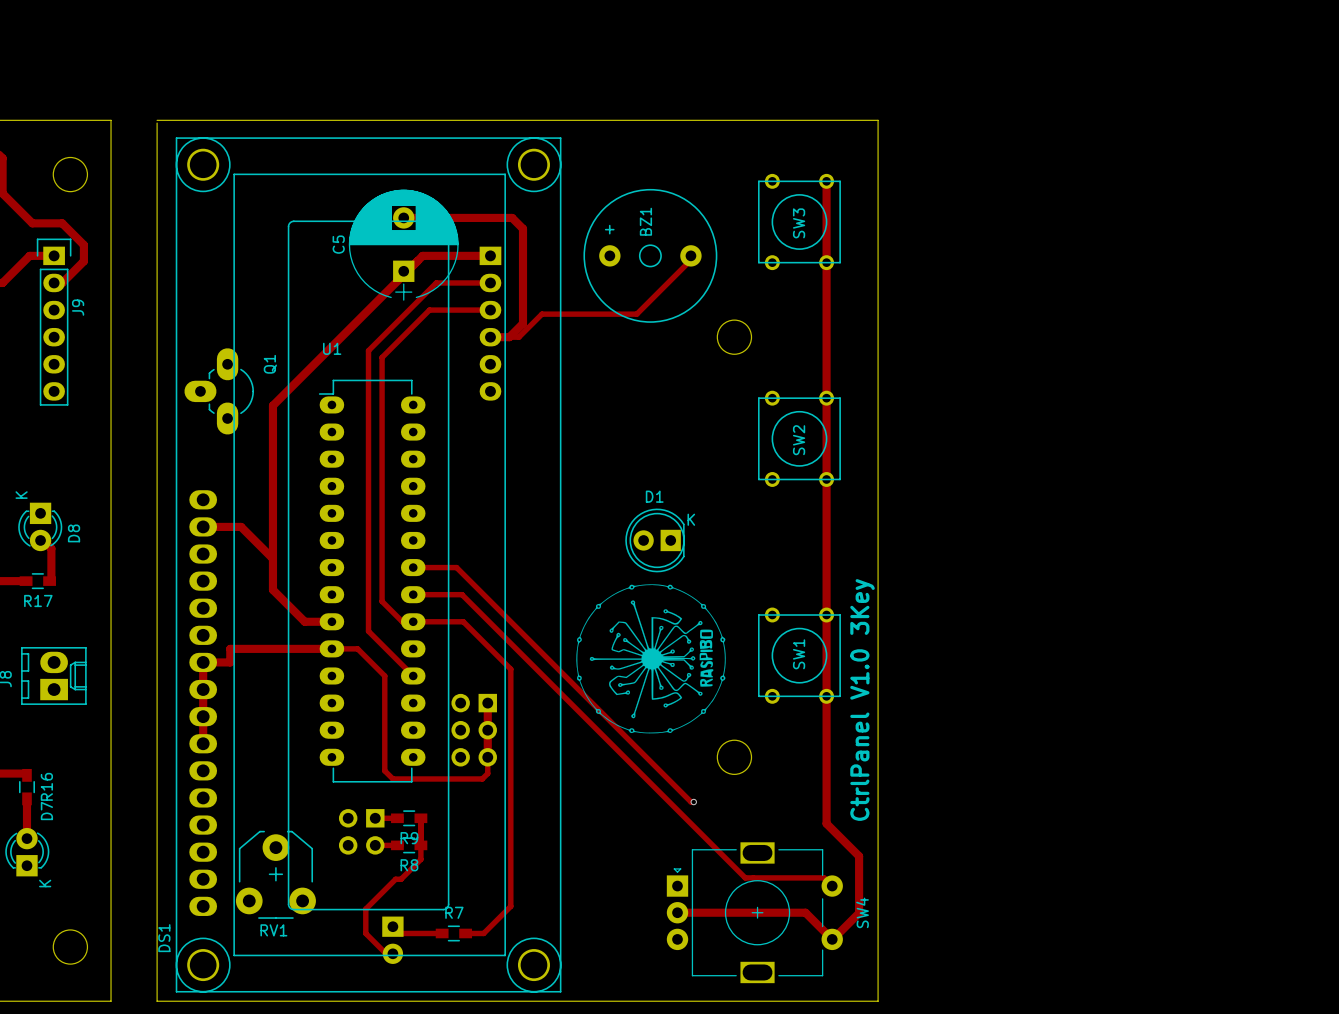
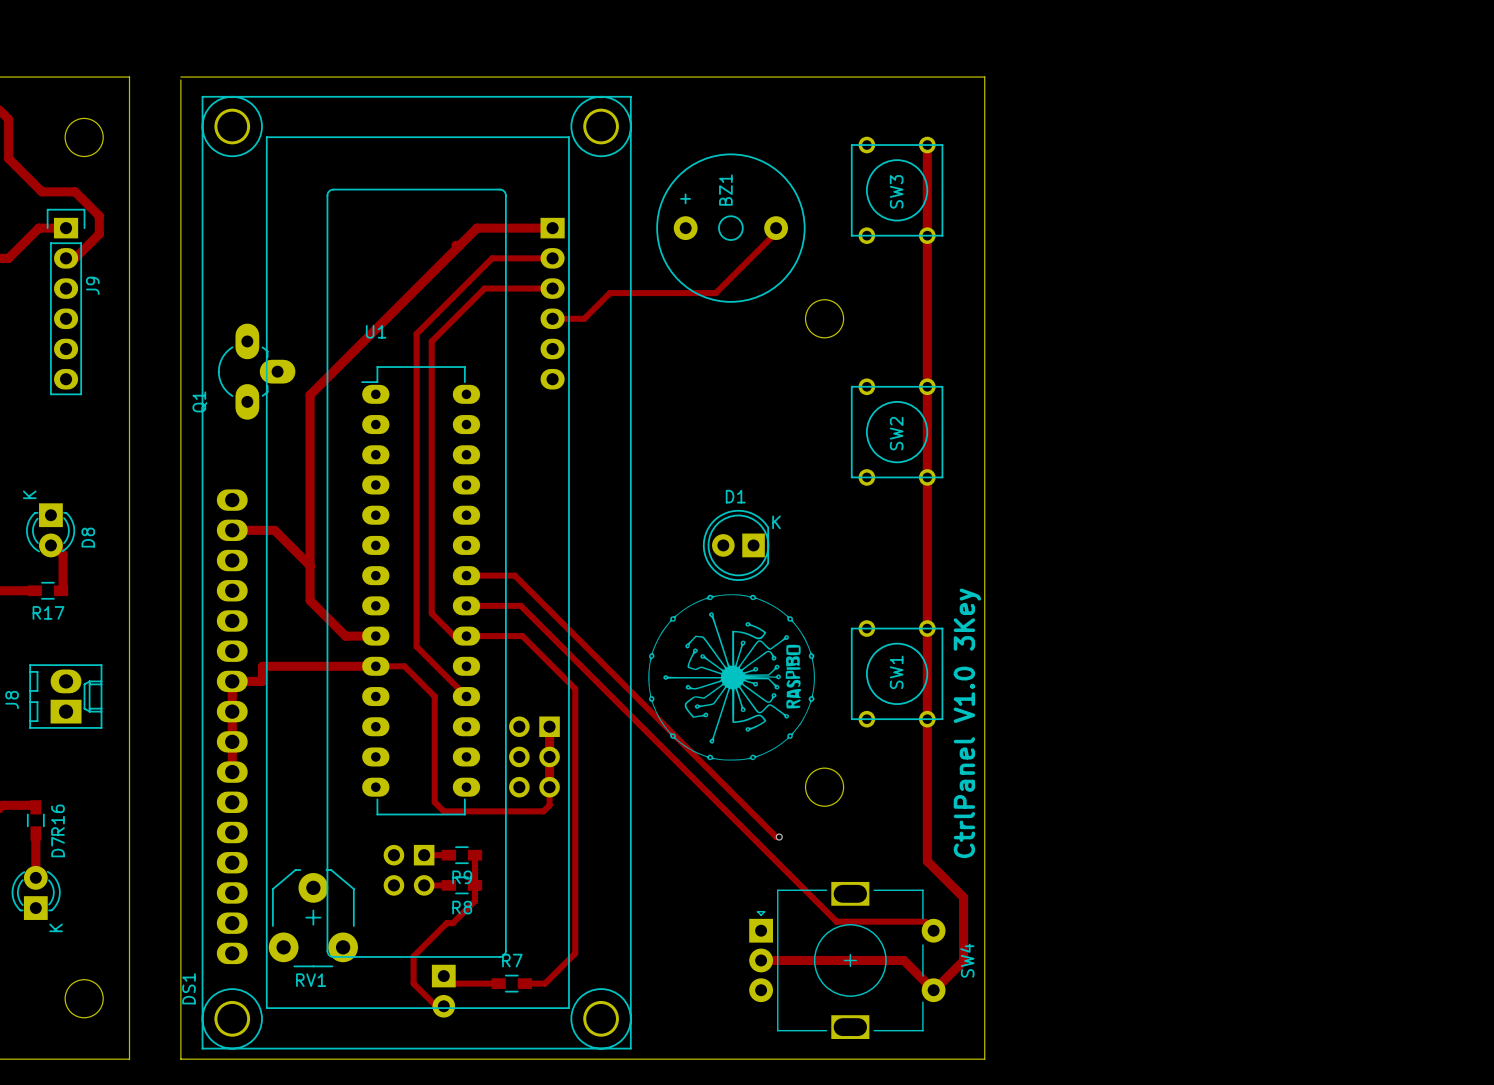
track: (403, 217) (512, 217) (523, 228) (523, 323) (509, 337) (490, 337) -> none
C5: (403, 245) -> none
Q1 rotation: 0° (219, 391) -> 180° (256, 371)

